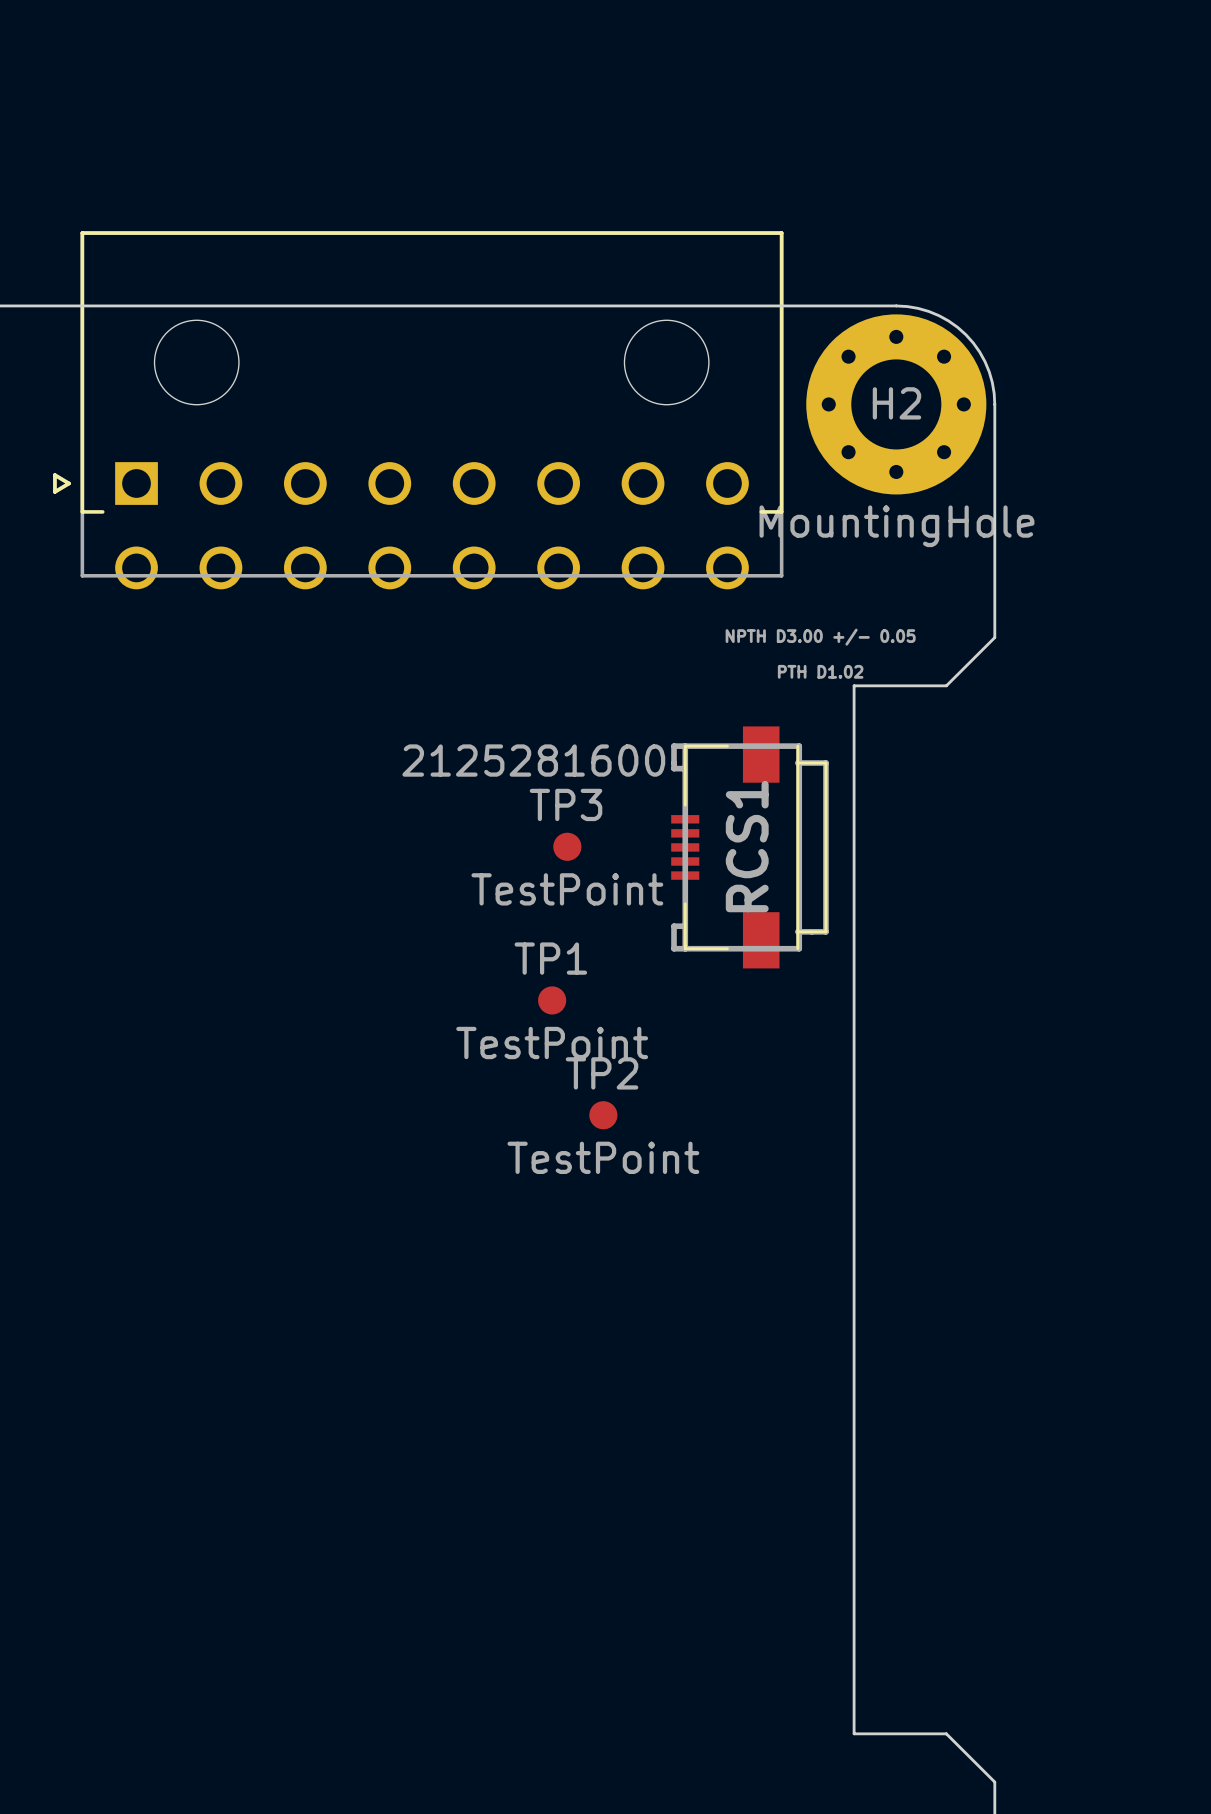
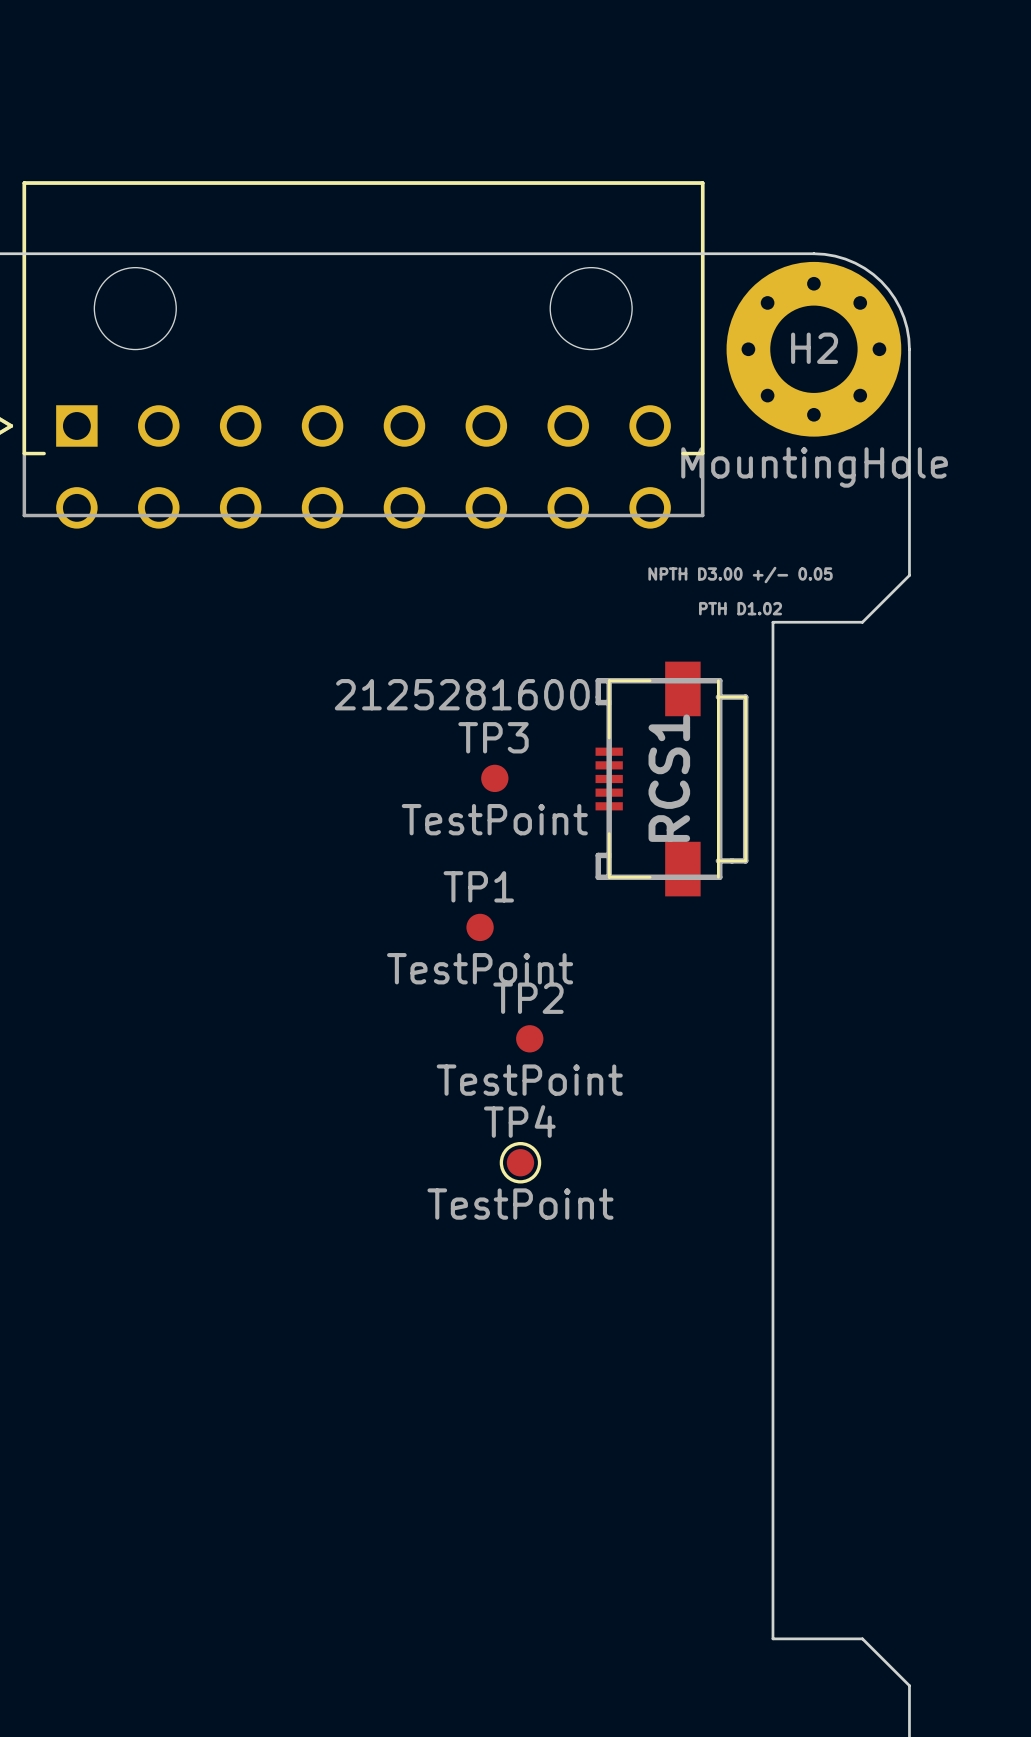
TP4: none -> TestPoint (520, 1162)

